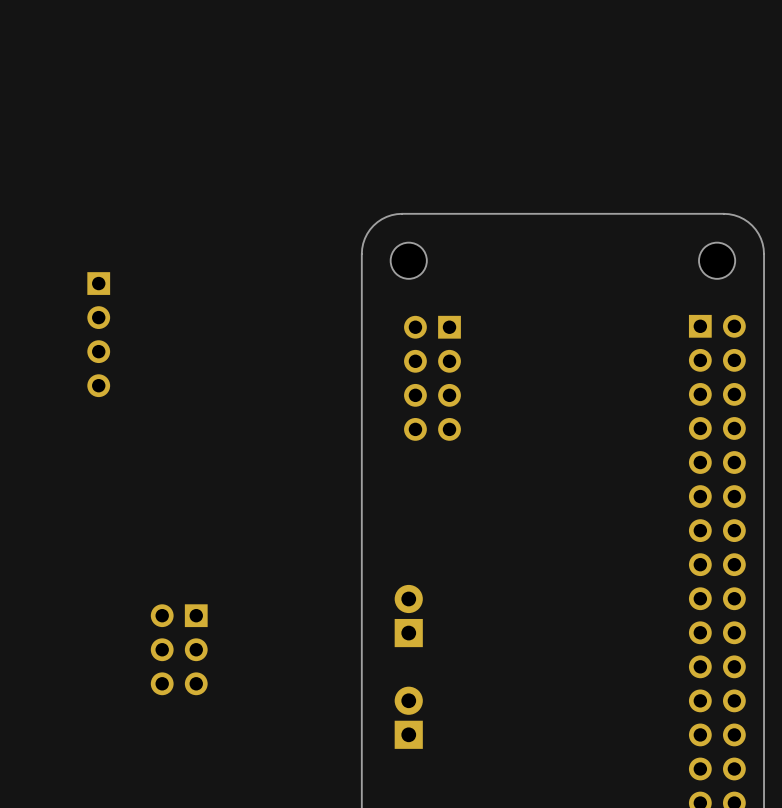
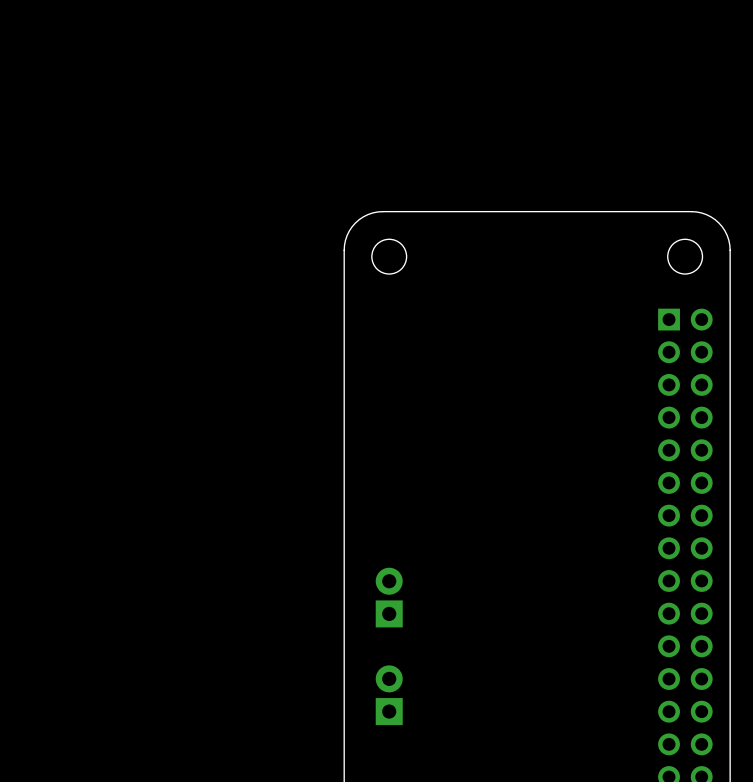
part: (98, 334) -> none
part: (432, 378) -> none
part: (179, 649) -> none

